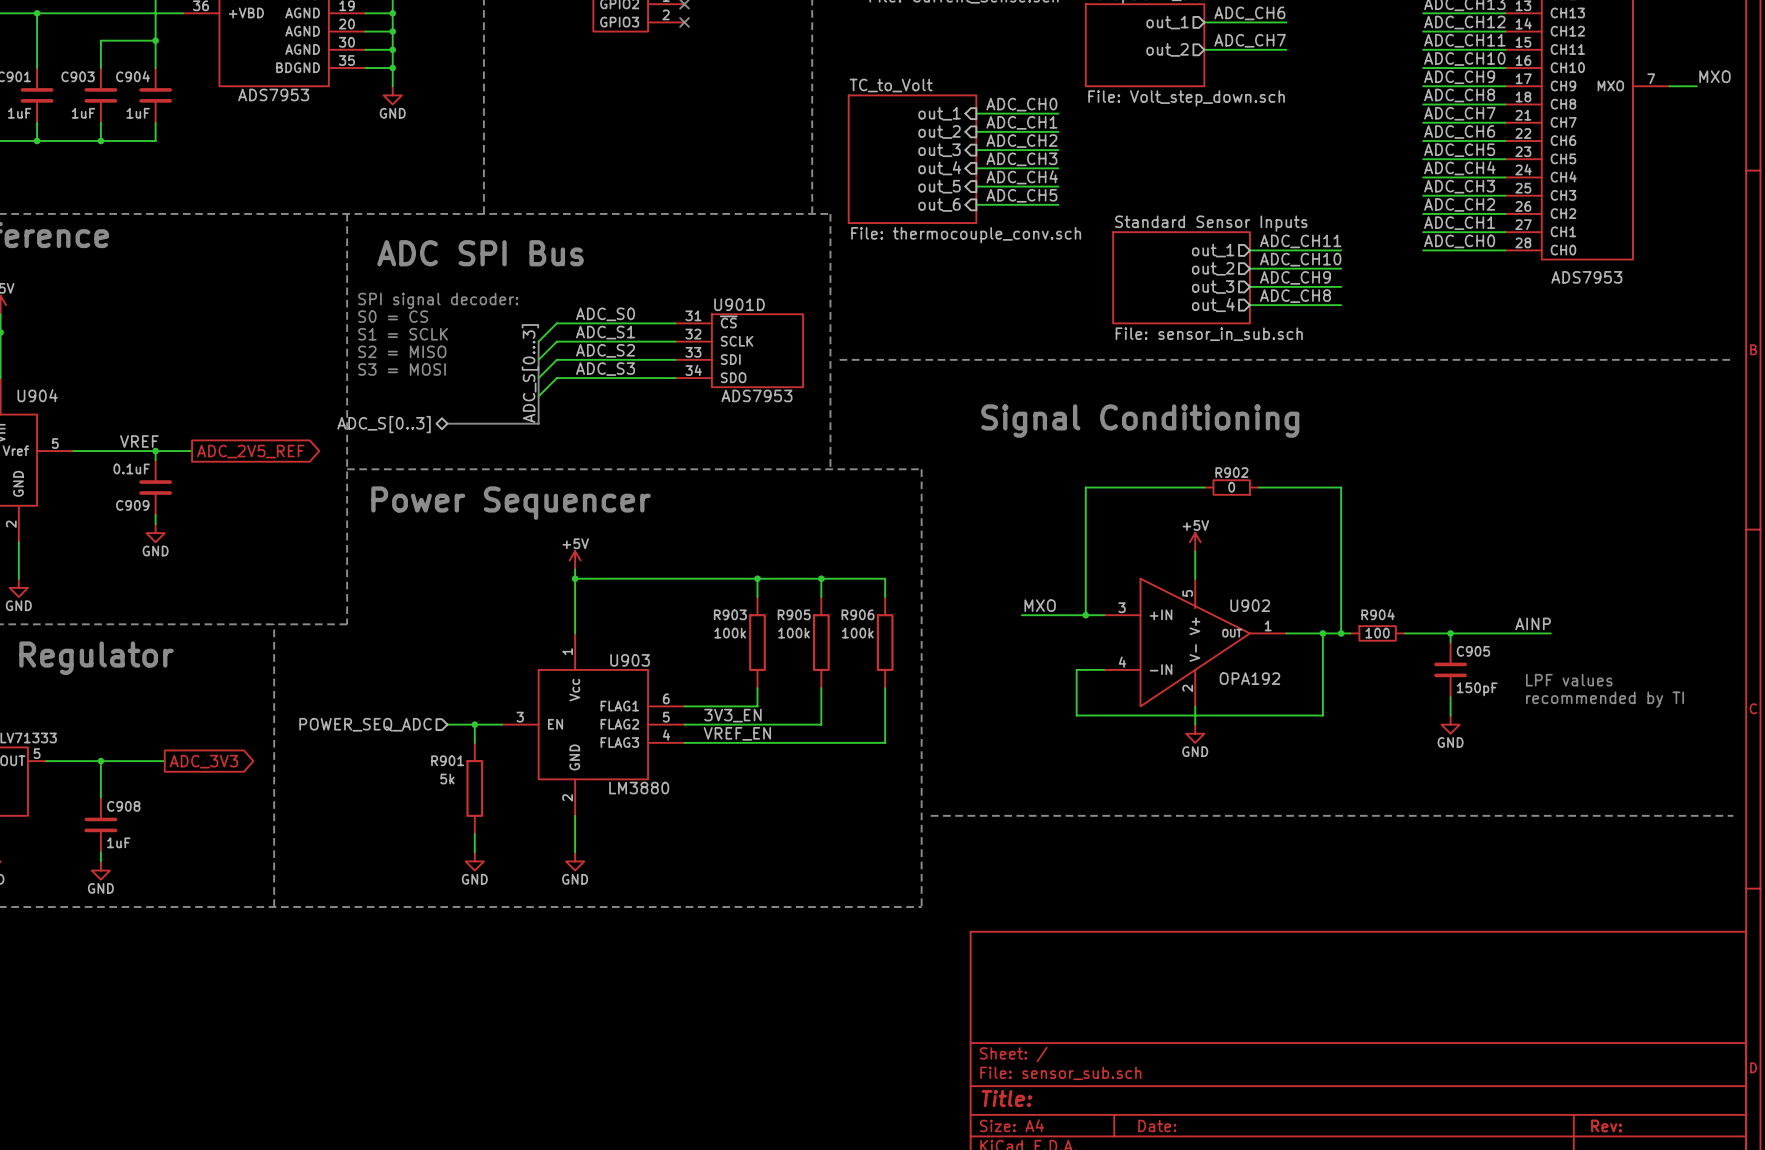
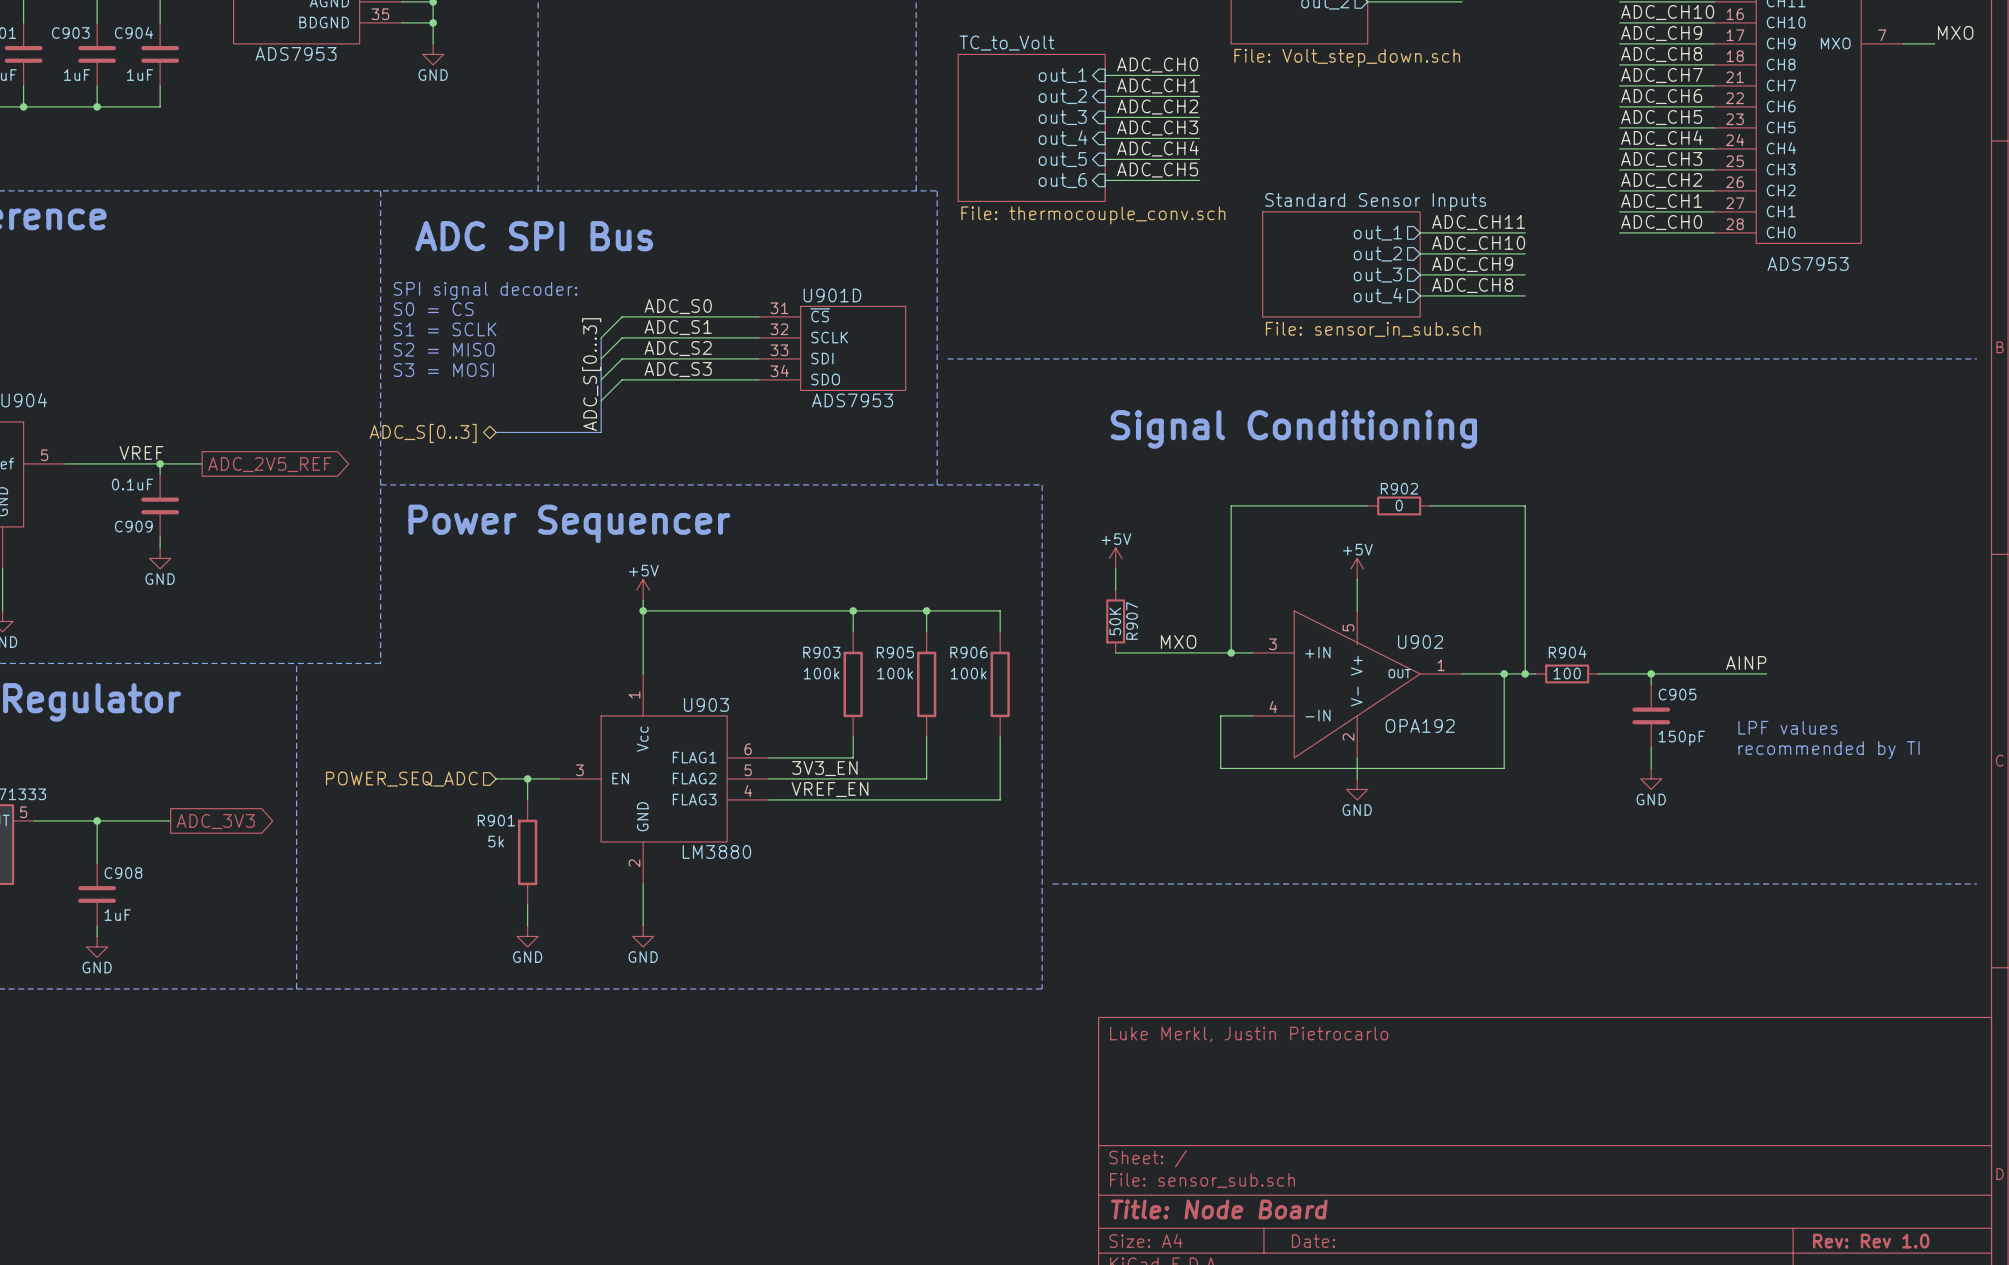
power symbol: none -> +5V (1115, 558)
wire: none -> (1115, 568) (1115, 589)
R907: none -> 50K (1115, 621)
wire: none -> (1115, 652) (1157, 652)
title block: none -> Luke Merkl, Justin Pietrocarlo (1249, 1034)
title block: Title: (1006, 1098) -> Title: Node Board (1219, 1209)
title block: Rev: (1606, 1125) -> Rev: Rev 1.0 (1871, 1241)

